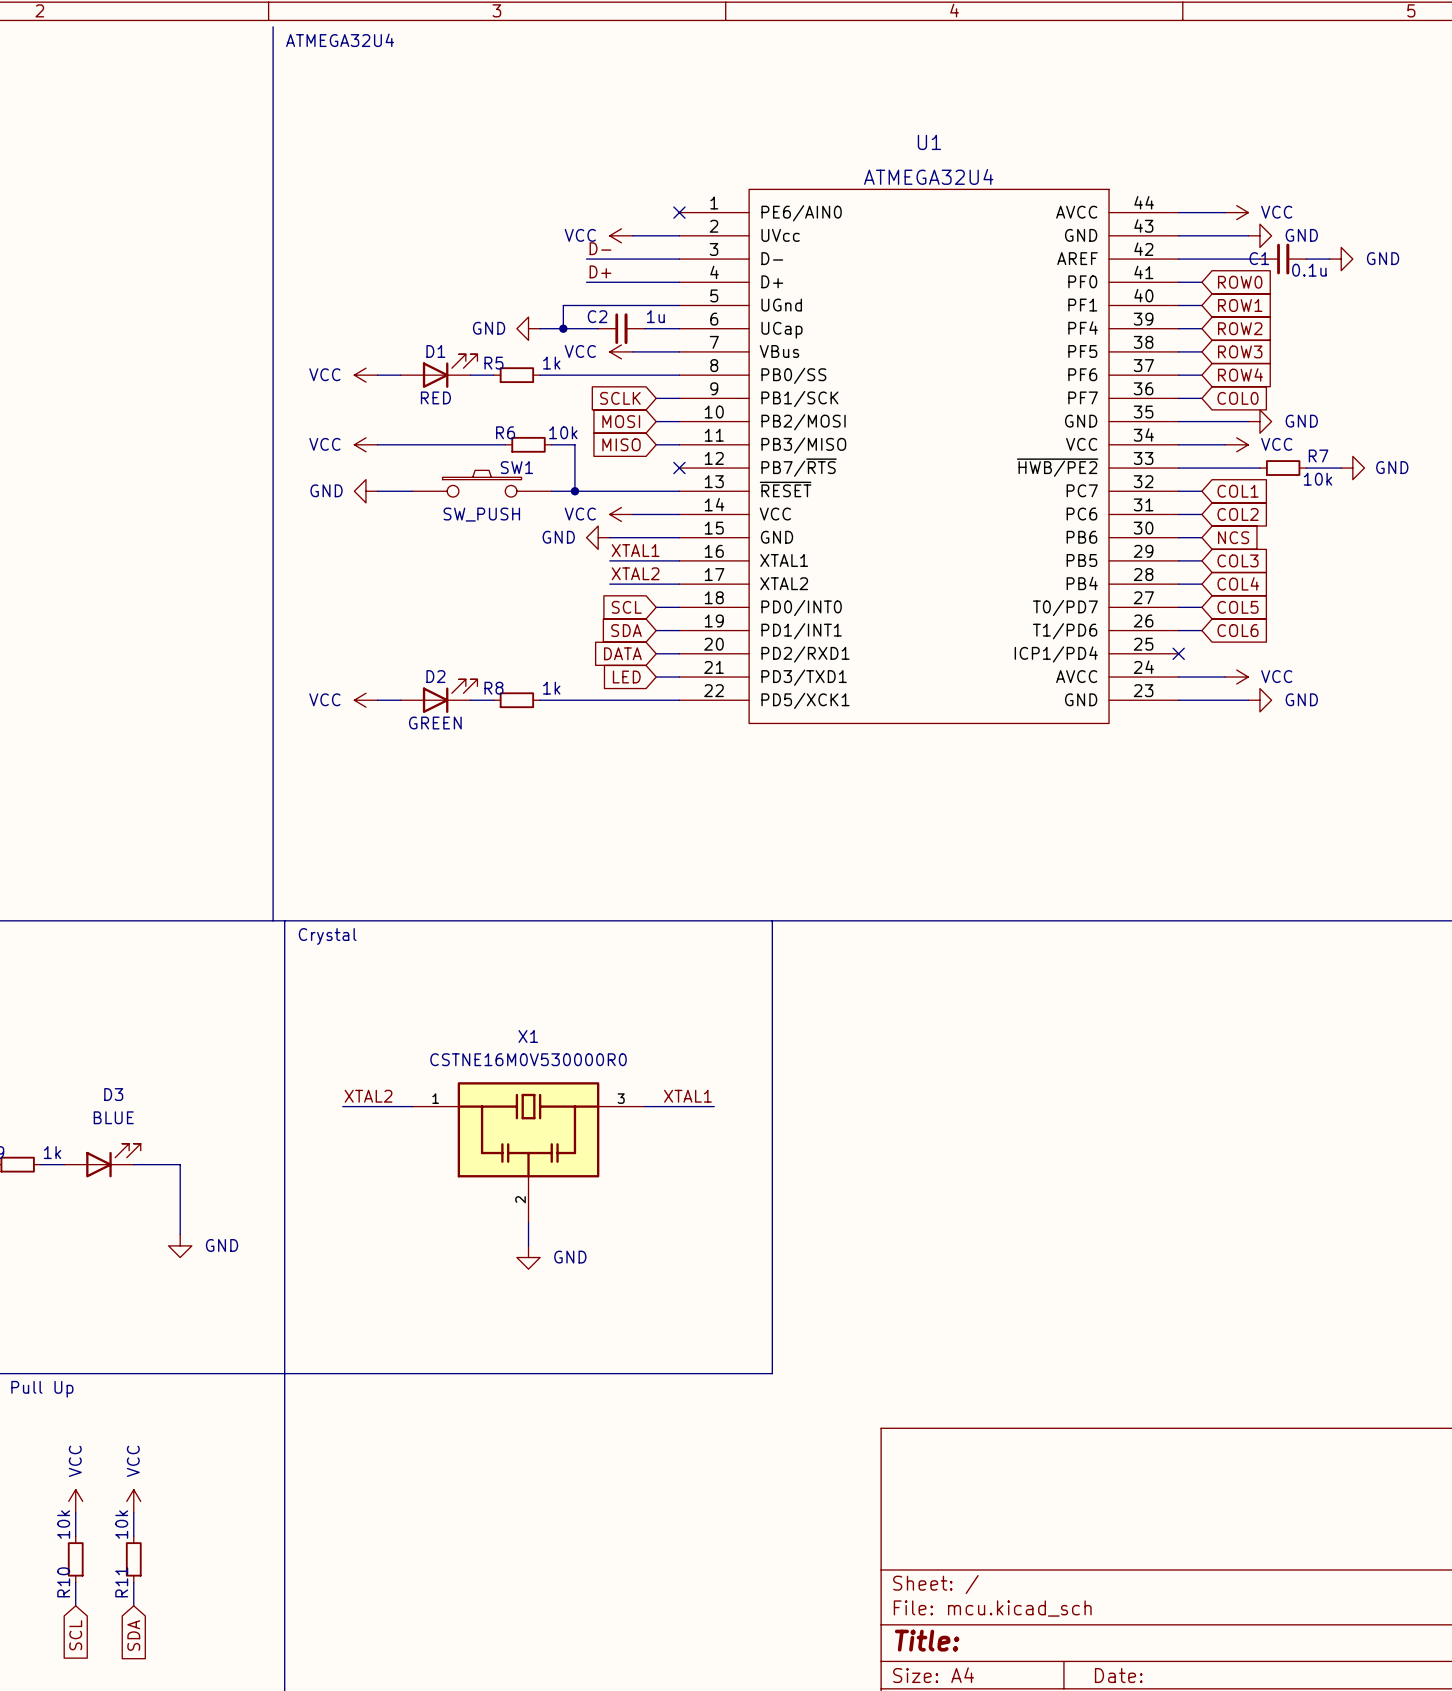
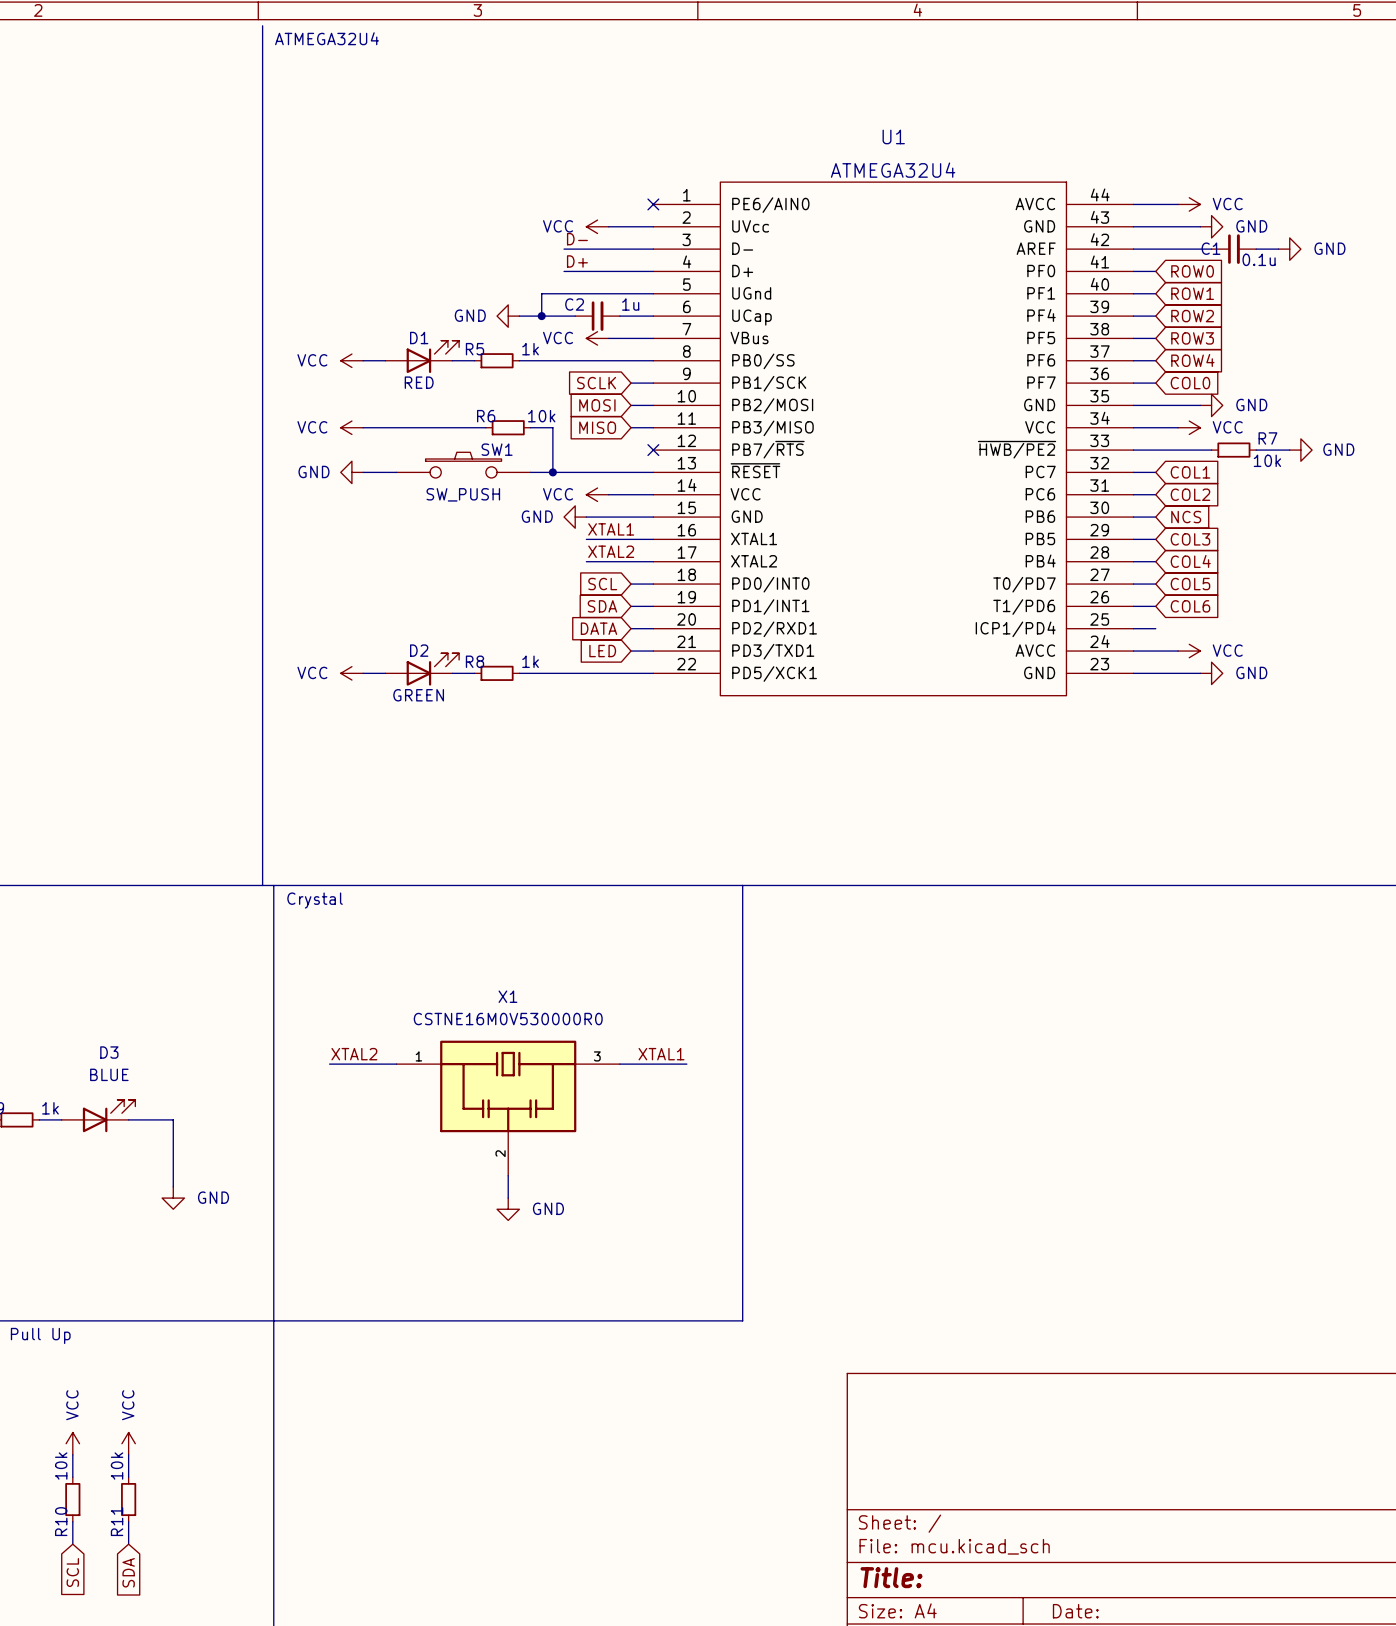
wire: none -> (1133, 628) (1155, 628)
no-connect mark: (1178, 653) -> none

